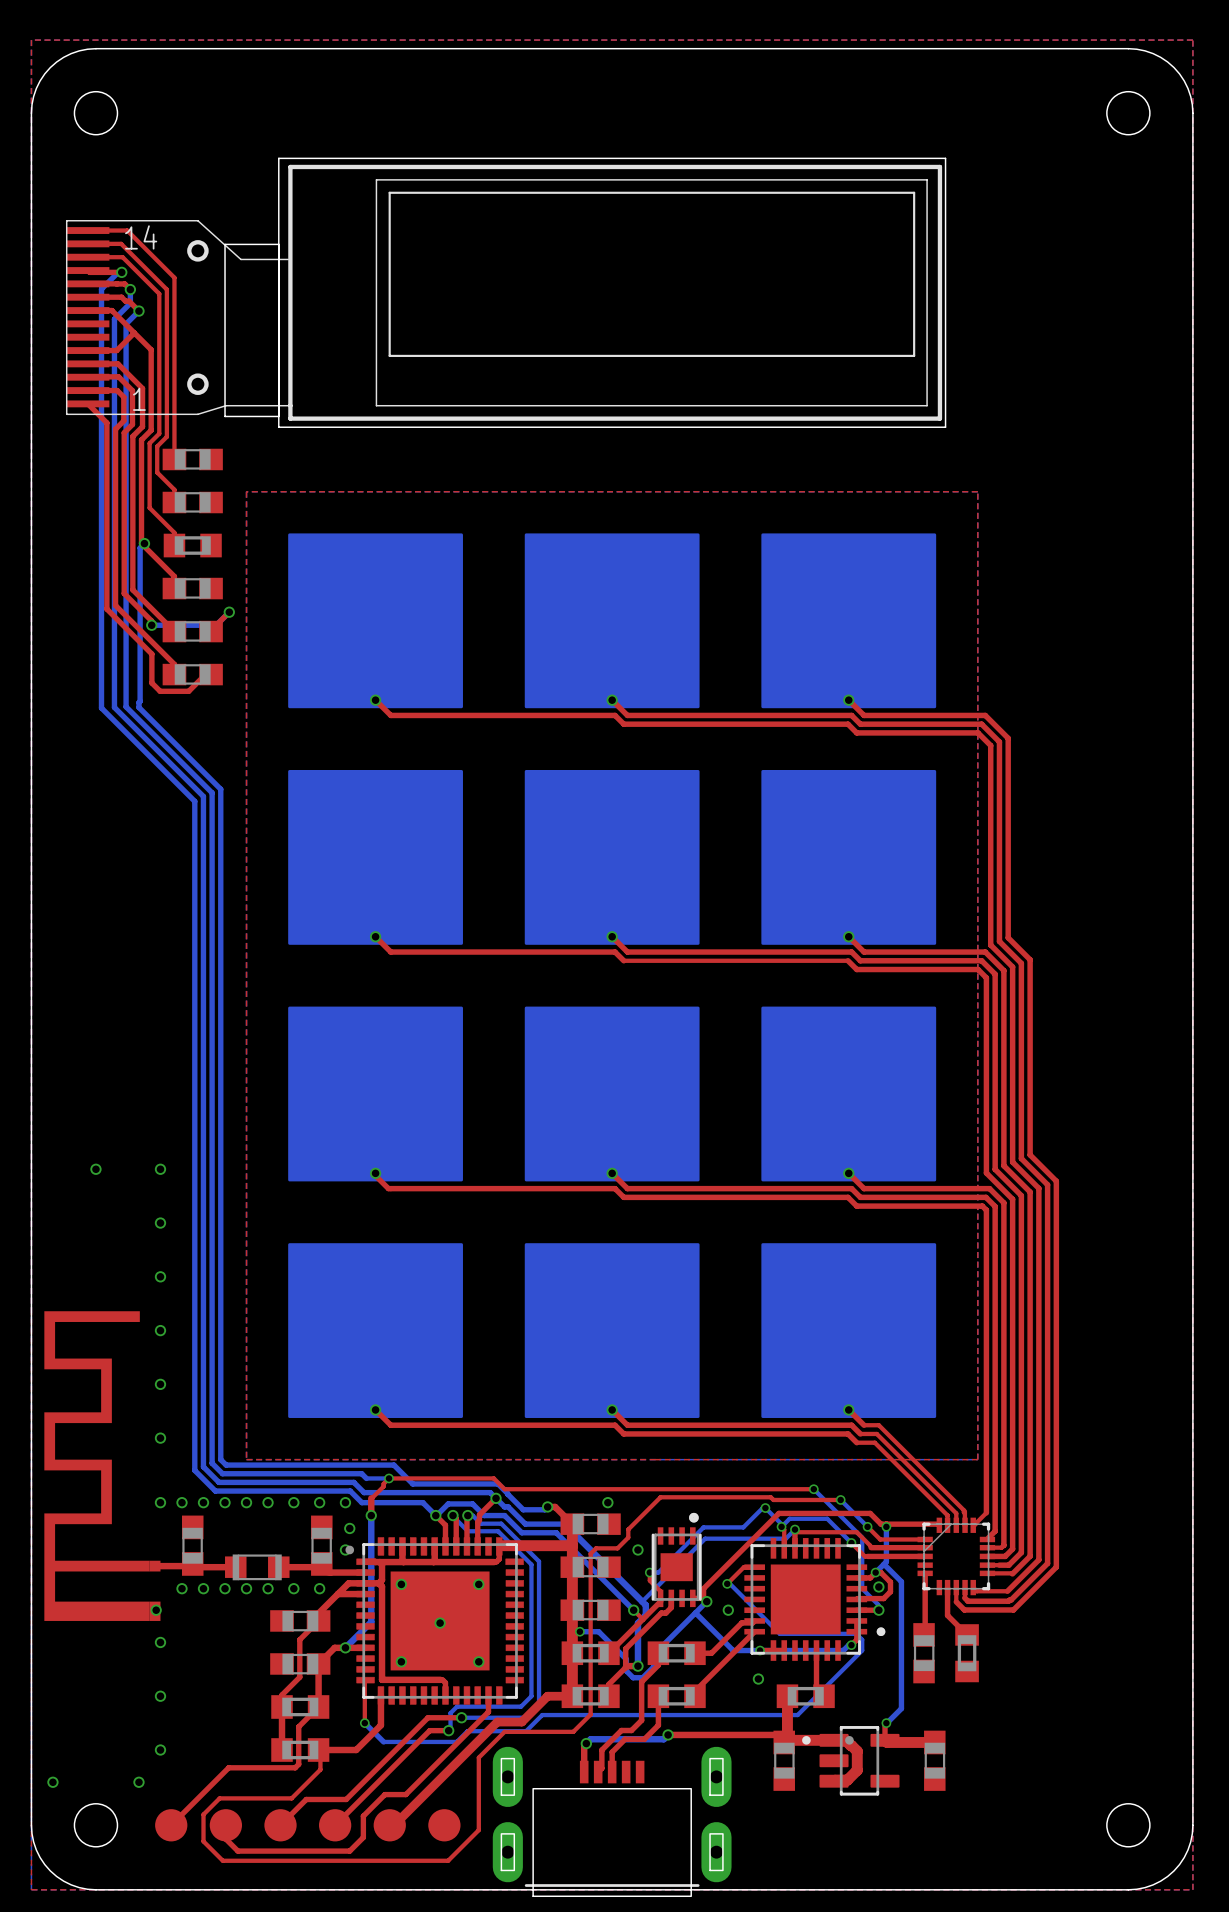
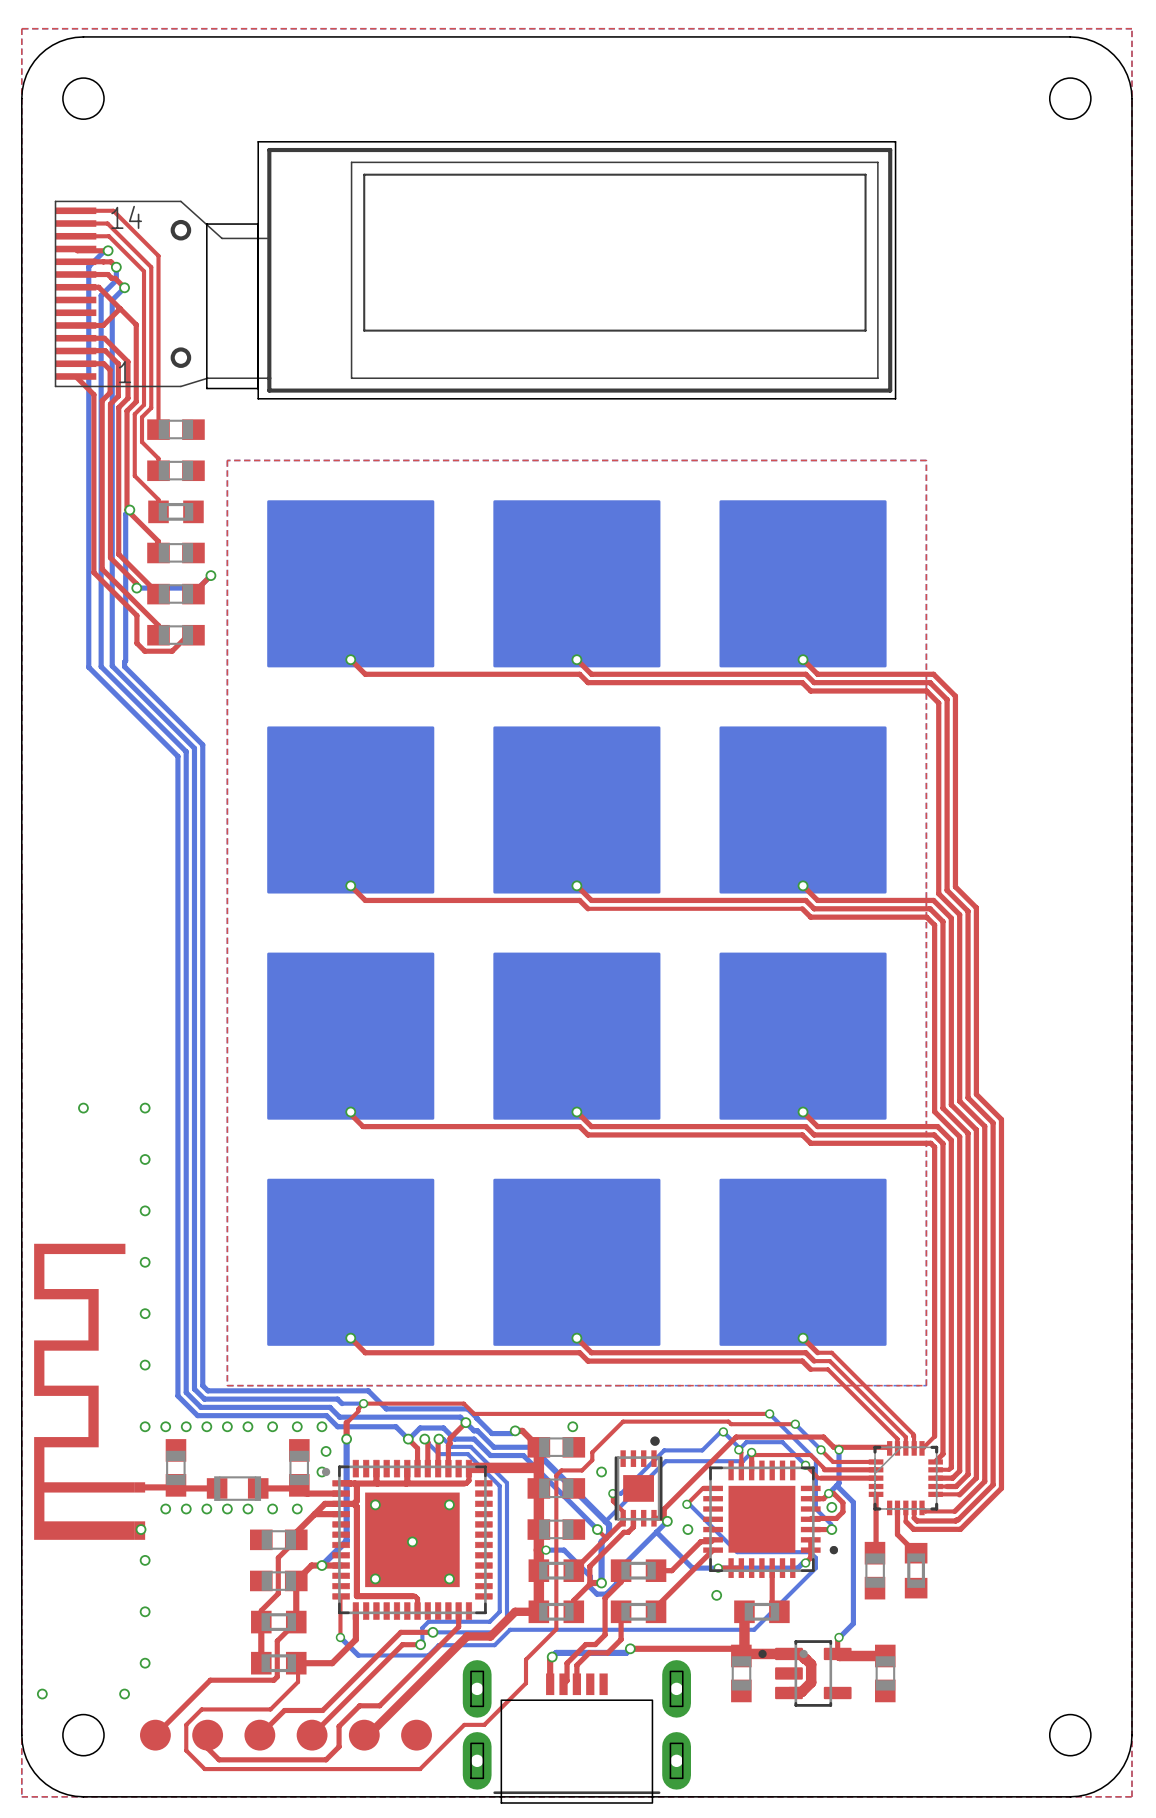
top track: (573, 1731) (504, 1731) (478, 1757) (478, 1830) -> (539, 1645) (526, 1659) (526, 1683) (484, 1724) (464, 1724) (449, 1739)

